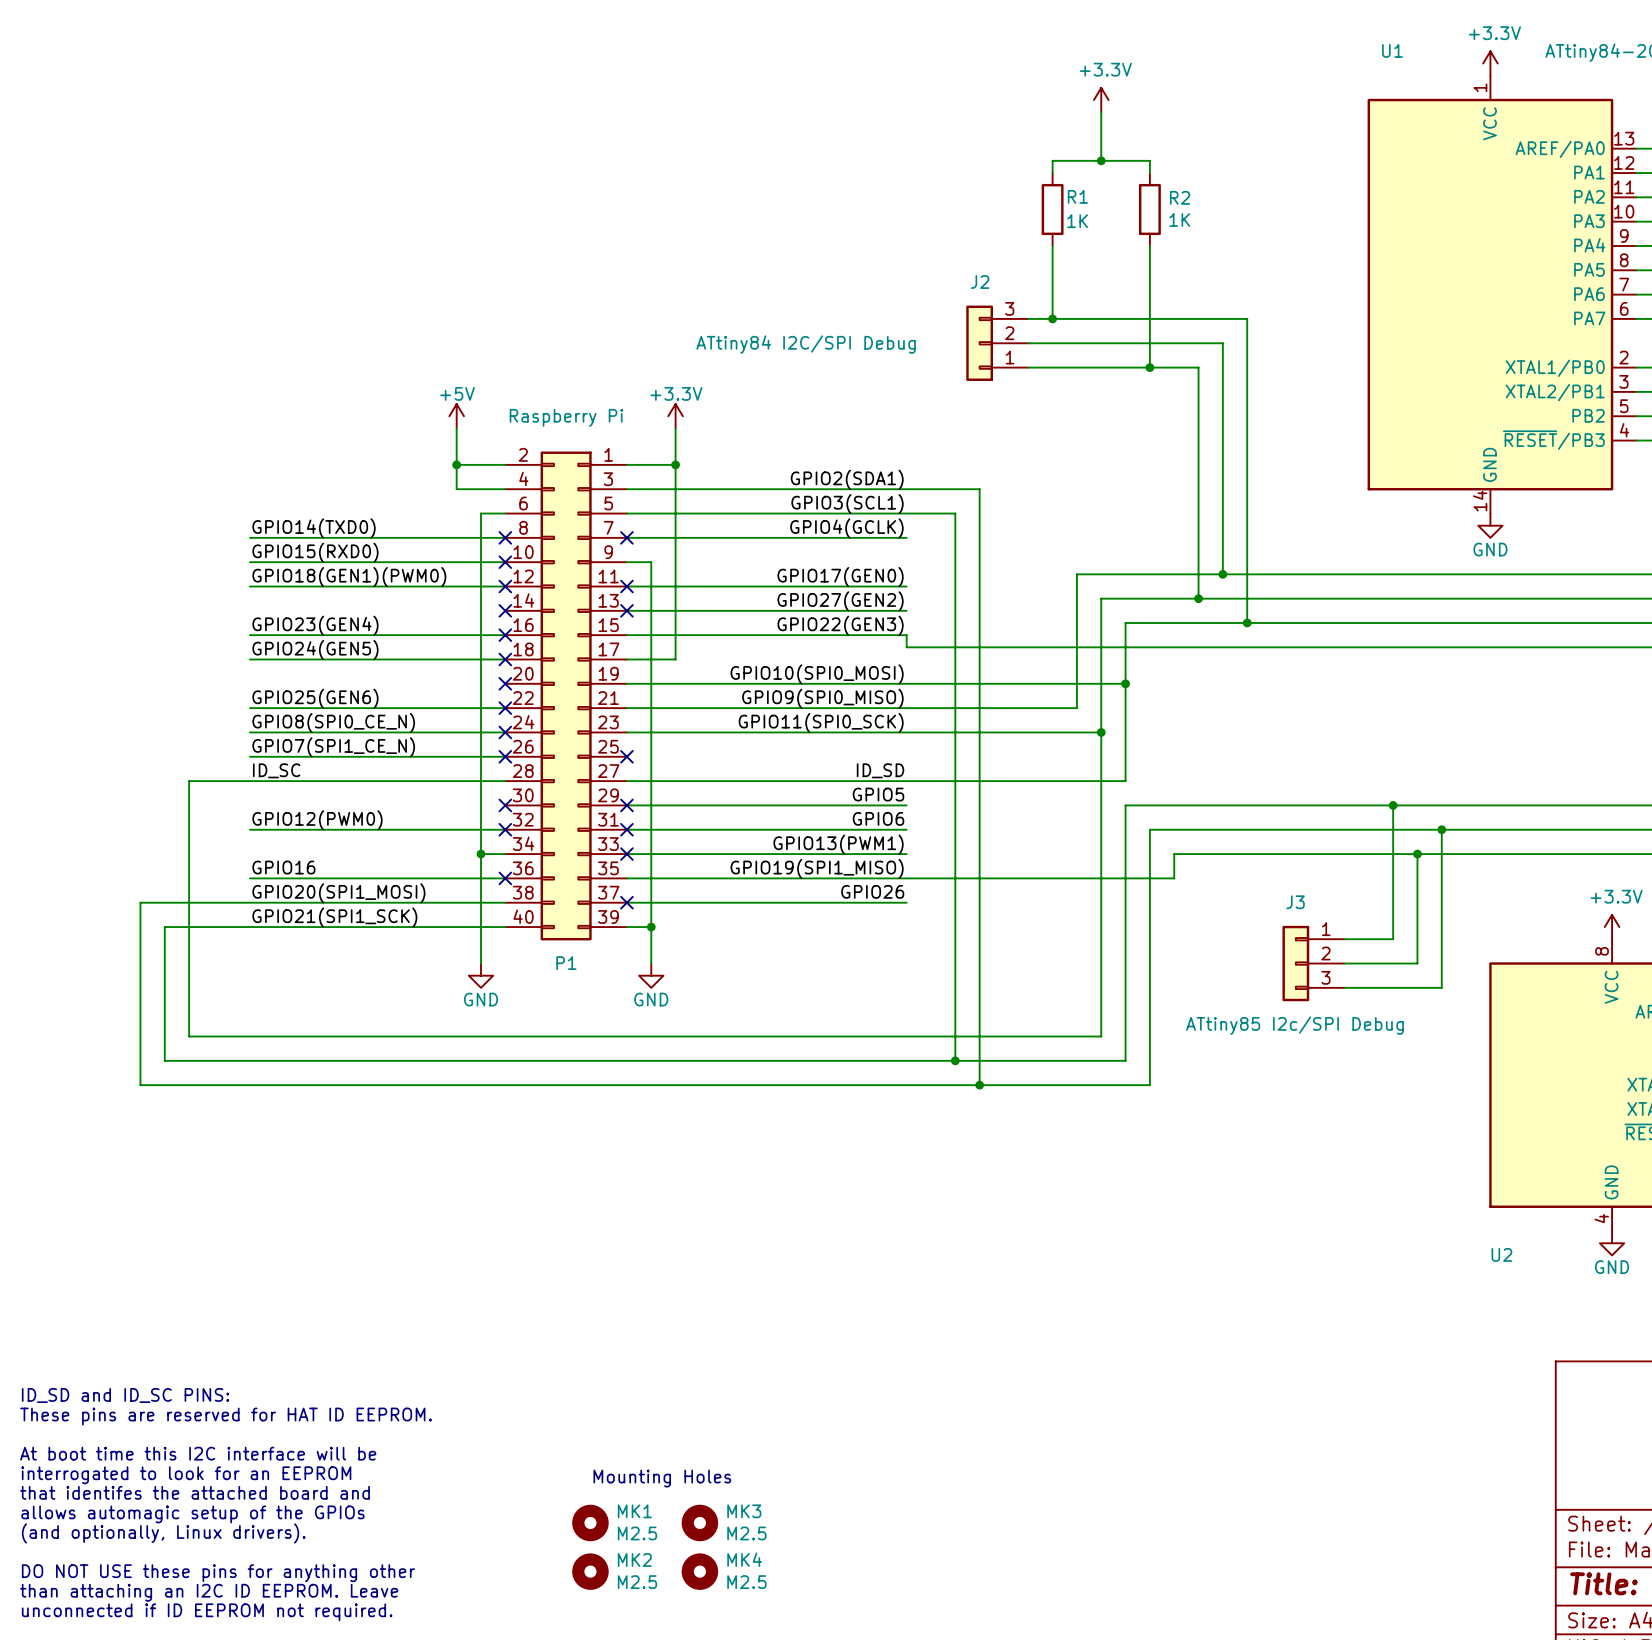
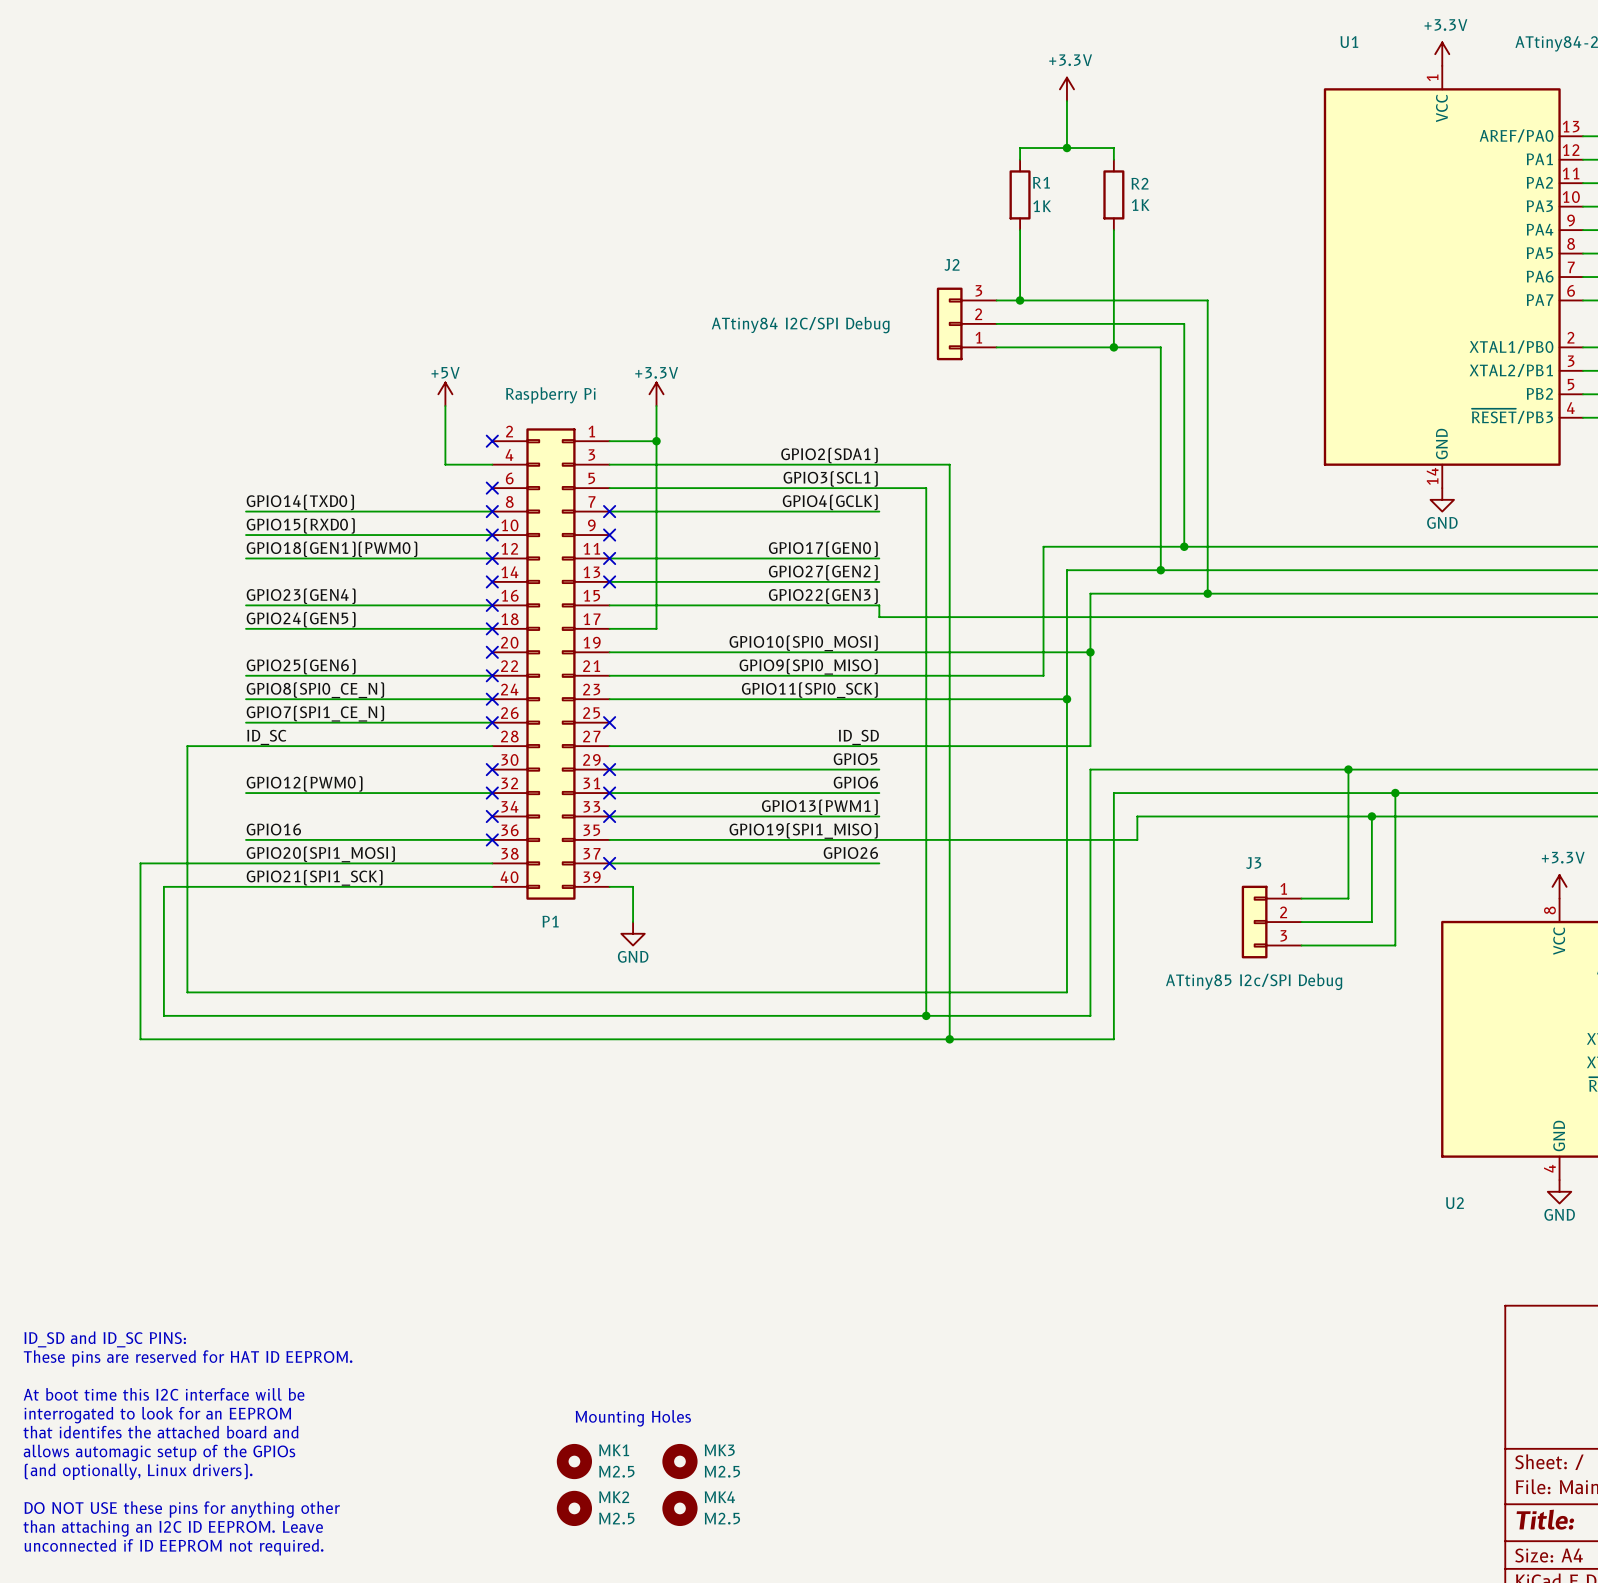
wire: (456, 464) (505, 464) -> none
junction: (456, 464) -> none
no-connect mark: none -> (492, 441)
wire: (505, 513) (480, 513) (480, 963) -> none
no-connect mark: none -> (492, 488)
wire: (626, 562) (651, 562) (651, 927) -> none
no-connect mark: none -> (609, 535)
wire: (480, 854) (505, 854) -> none
junction: (480, 854) -> none
no-connect mark: none -> (492, 816)
junction: (651, 927) -> none
power symbol: GND (480, 975) -> none

